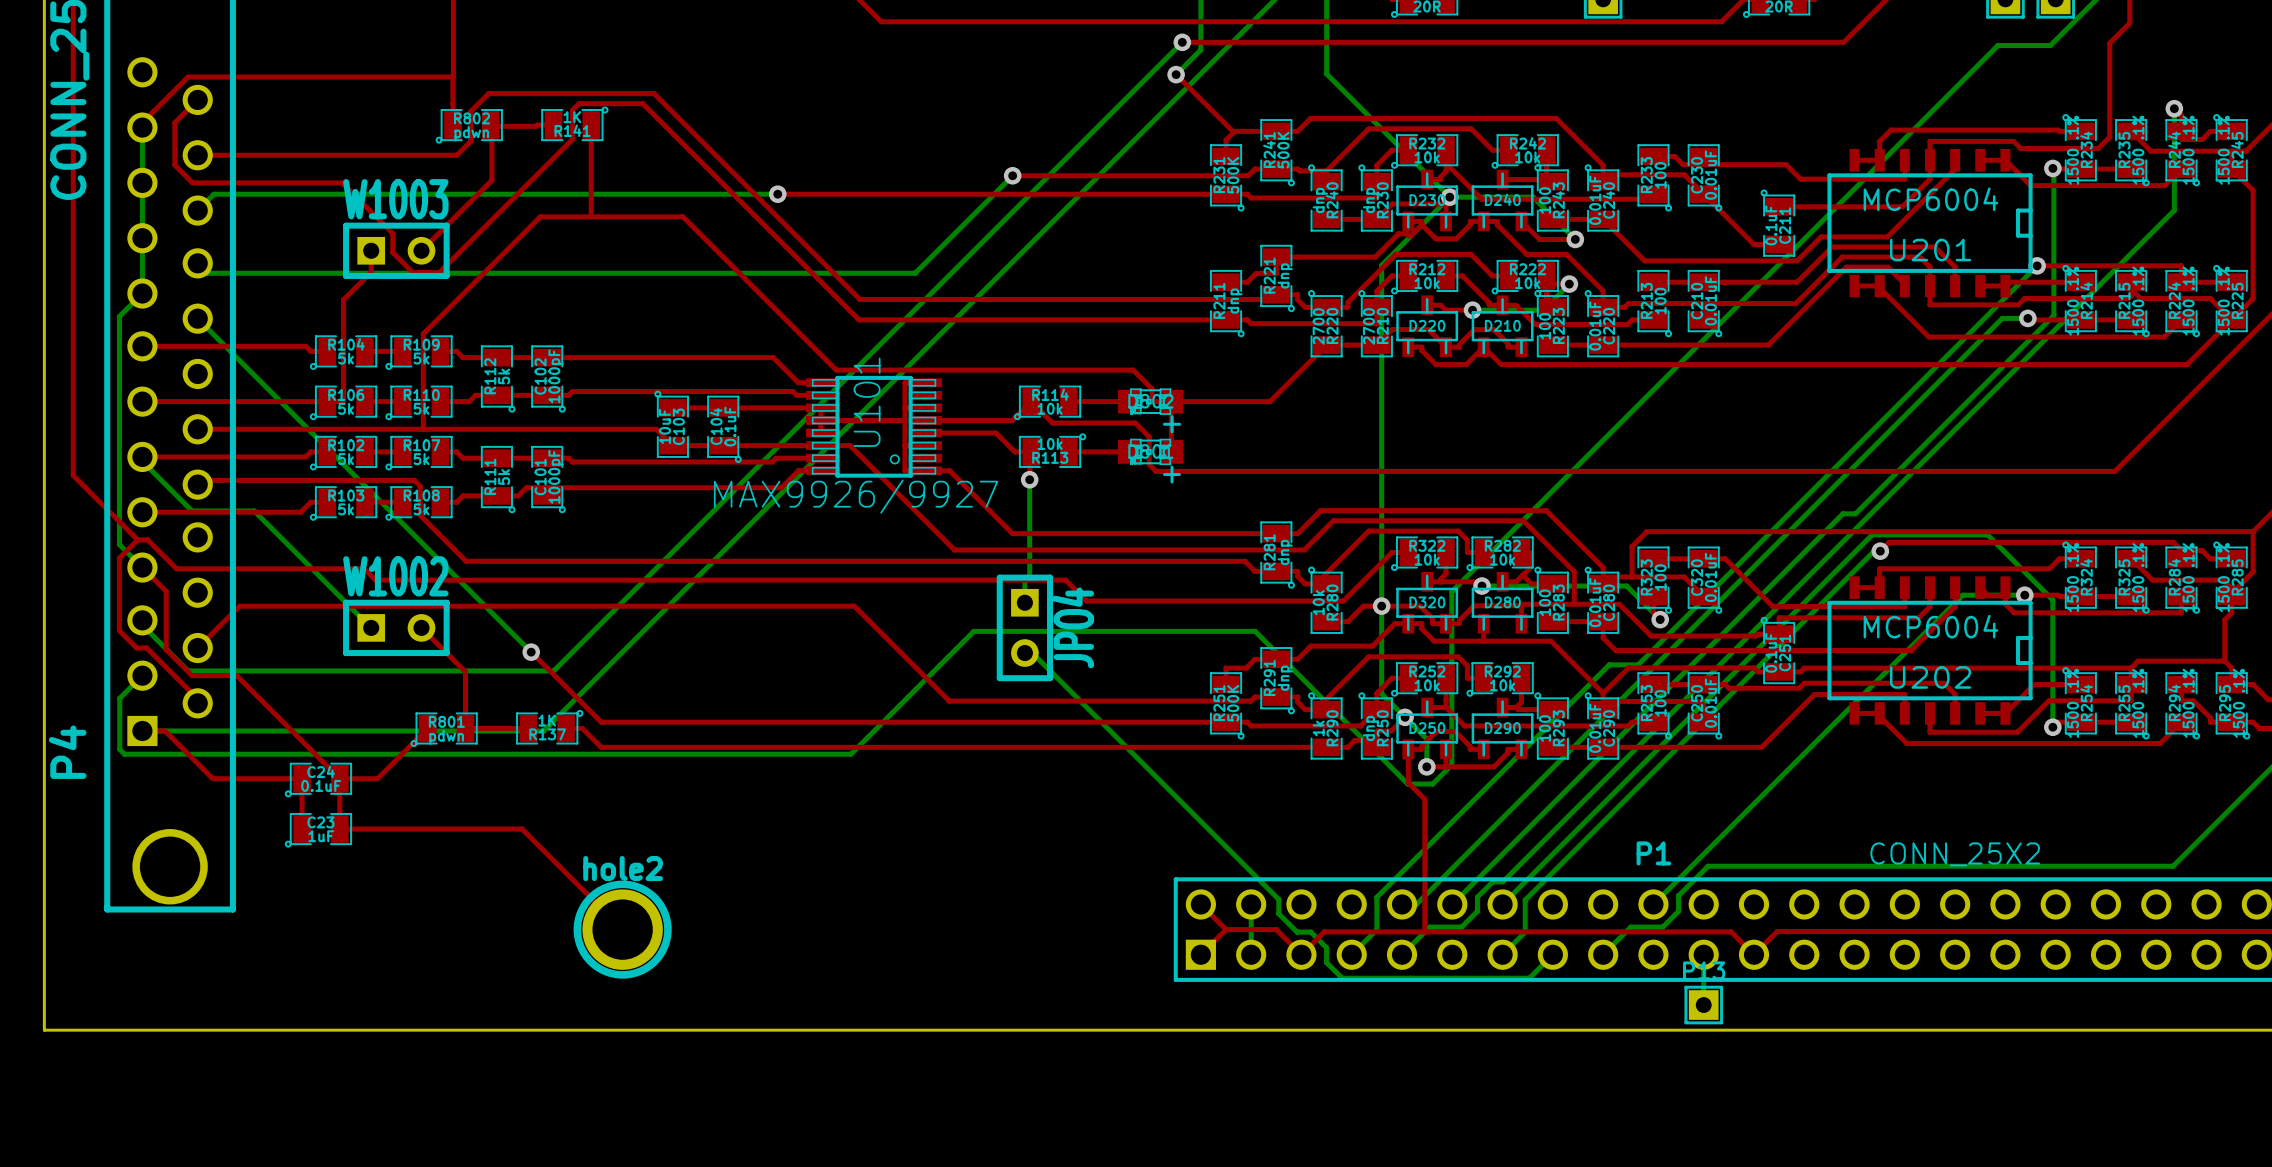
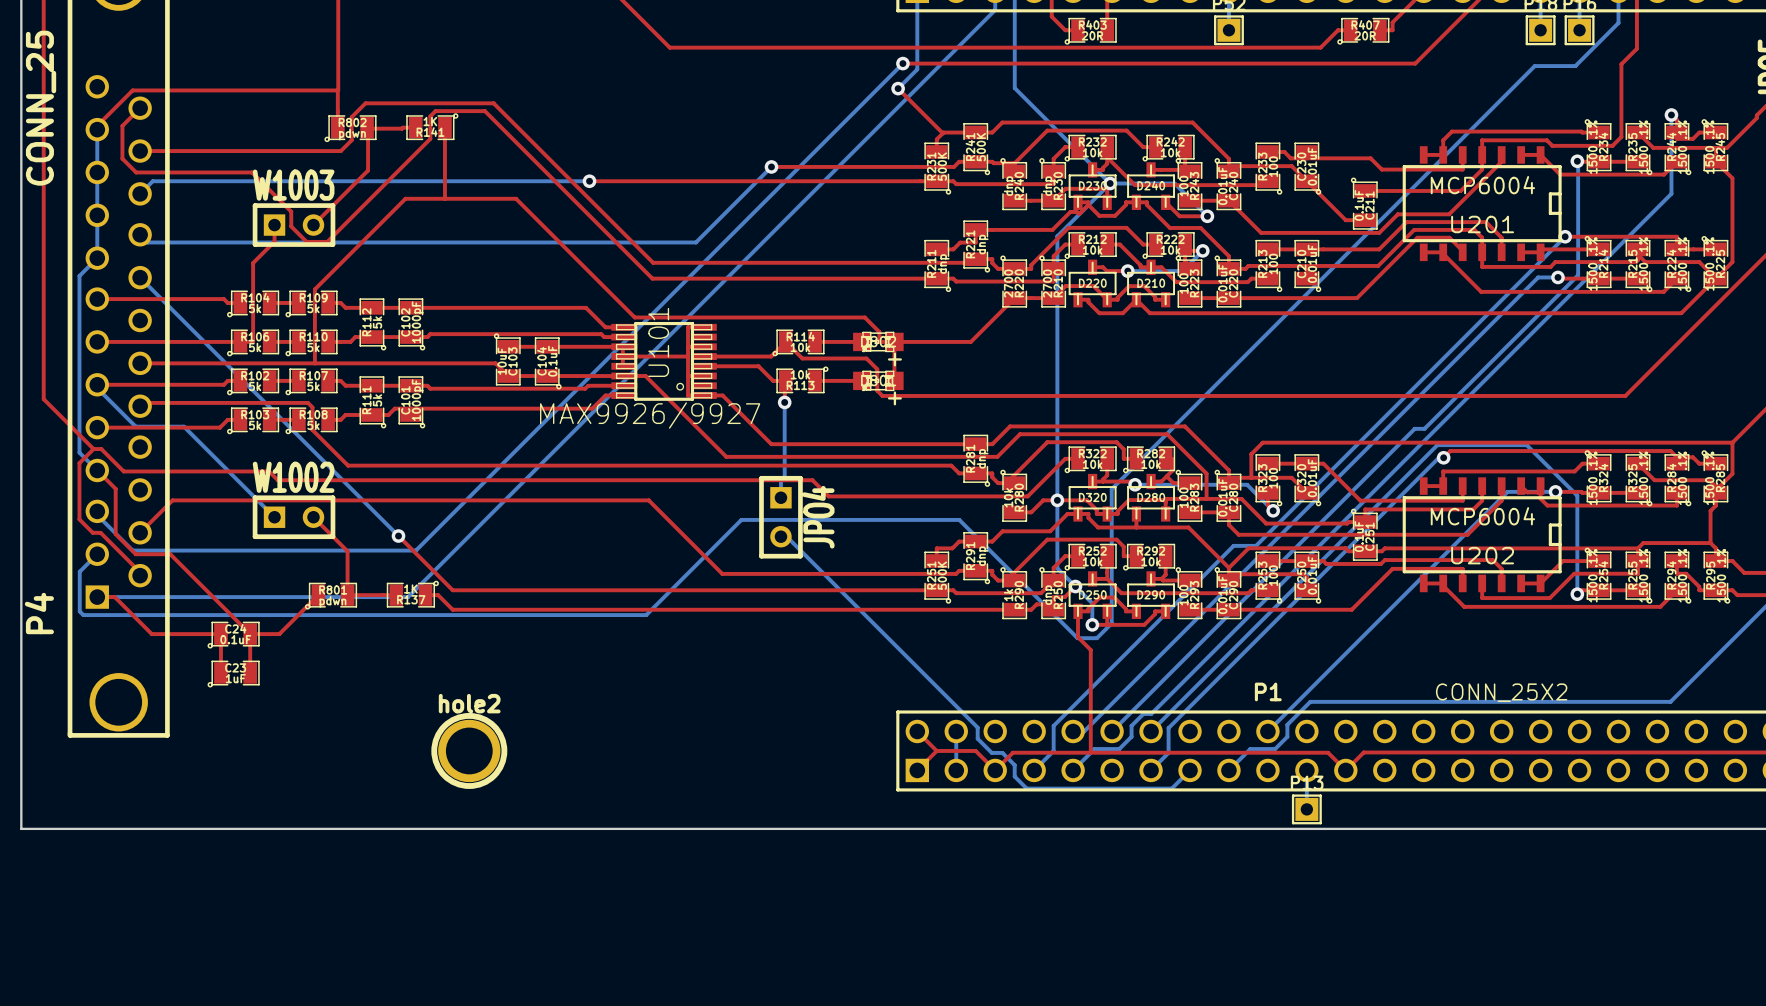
top track: (339, 829) (522, 829) (622, 929) -> none

